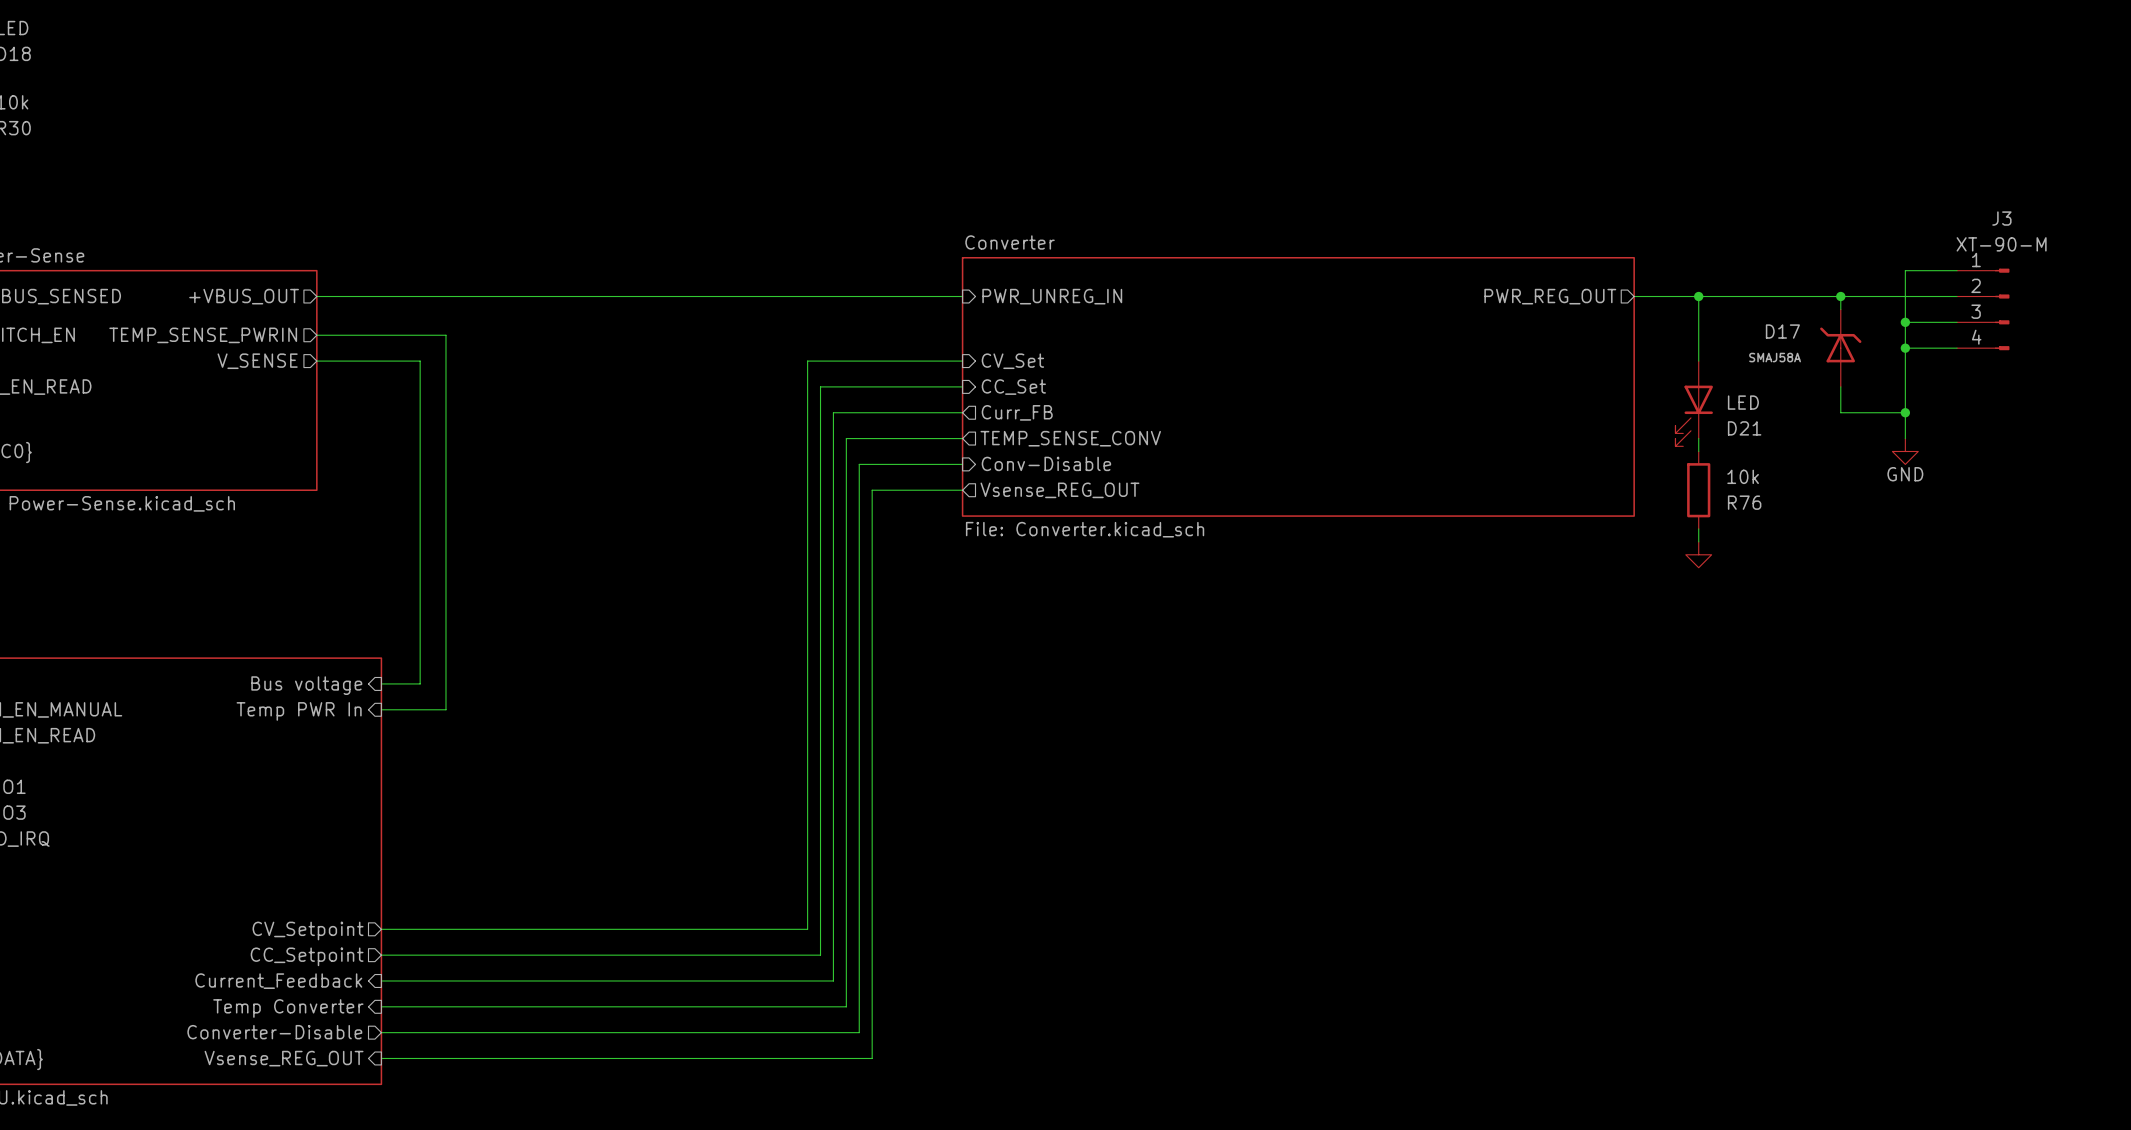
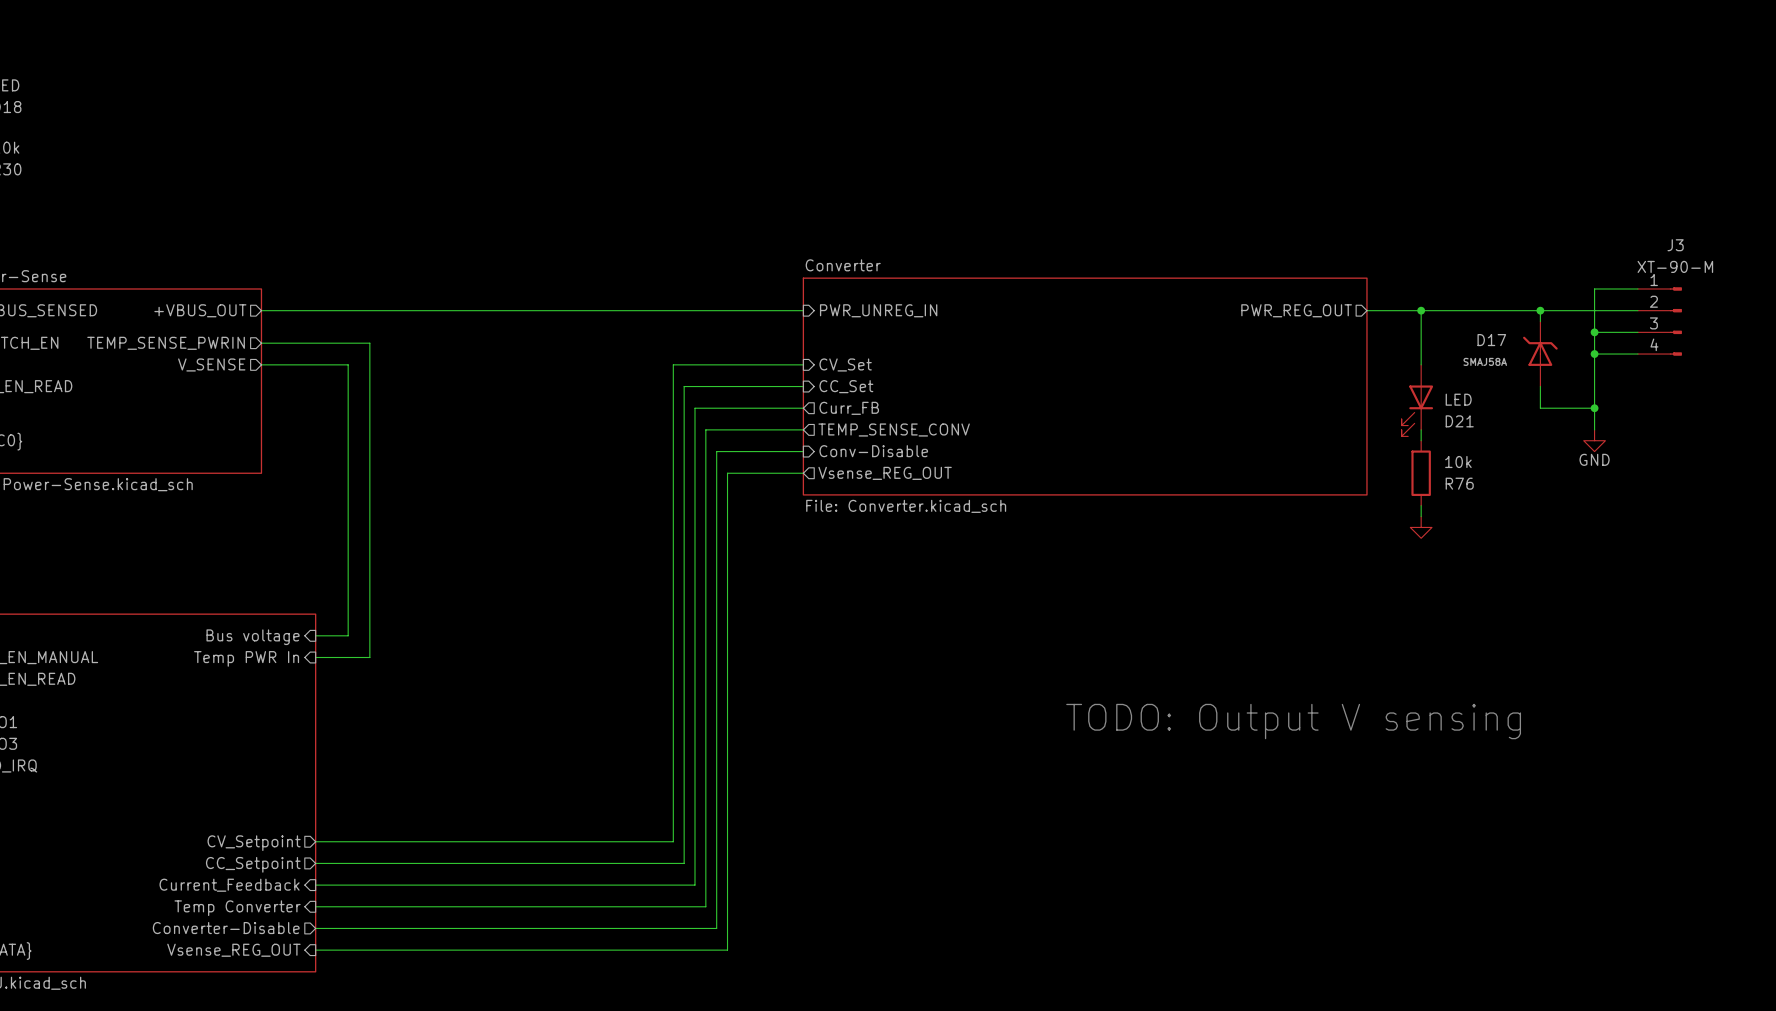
text: none -> TODO: Output V sensing (1293, 721)

